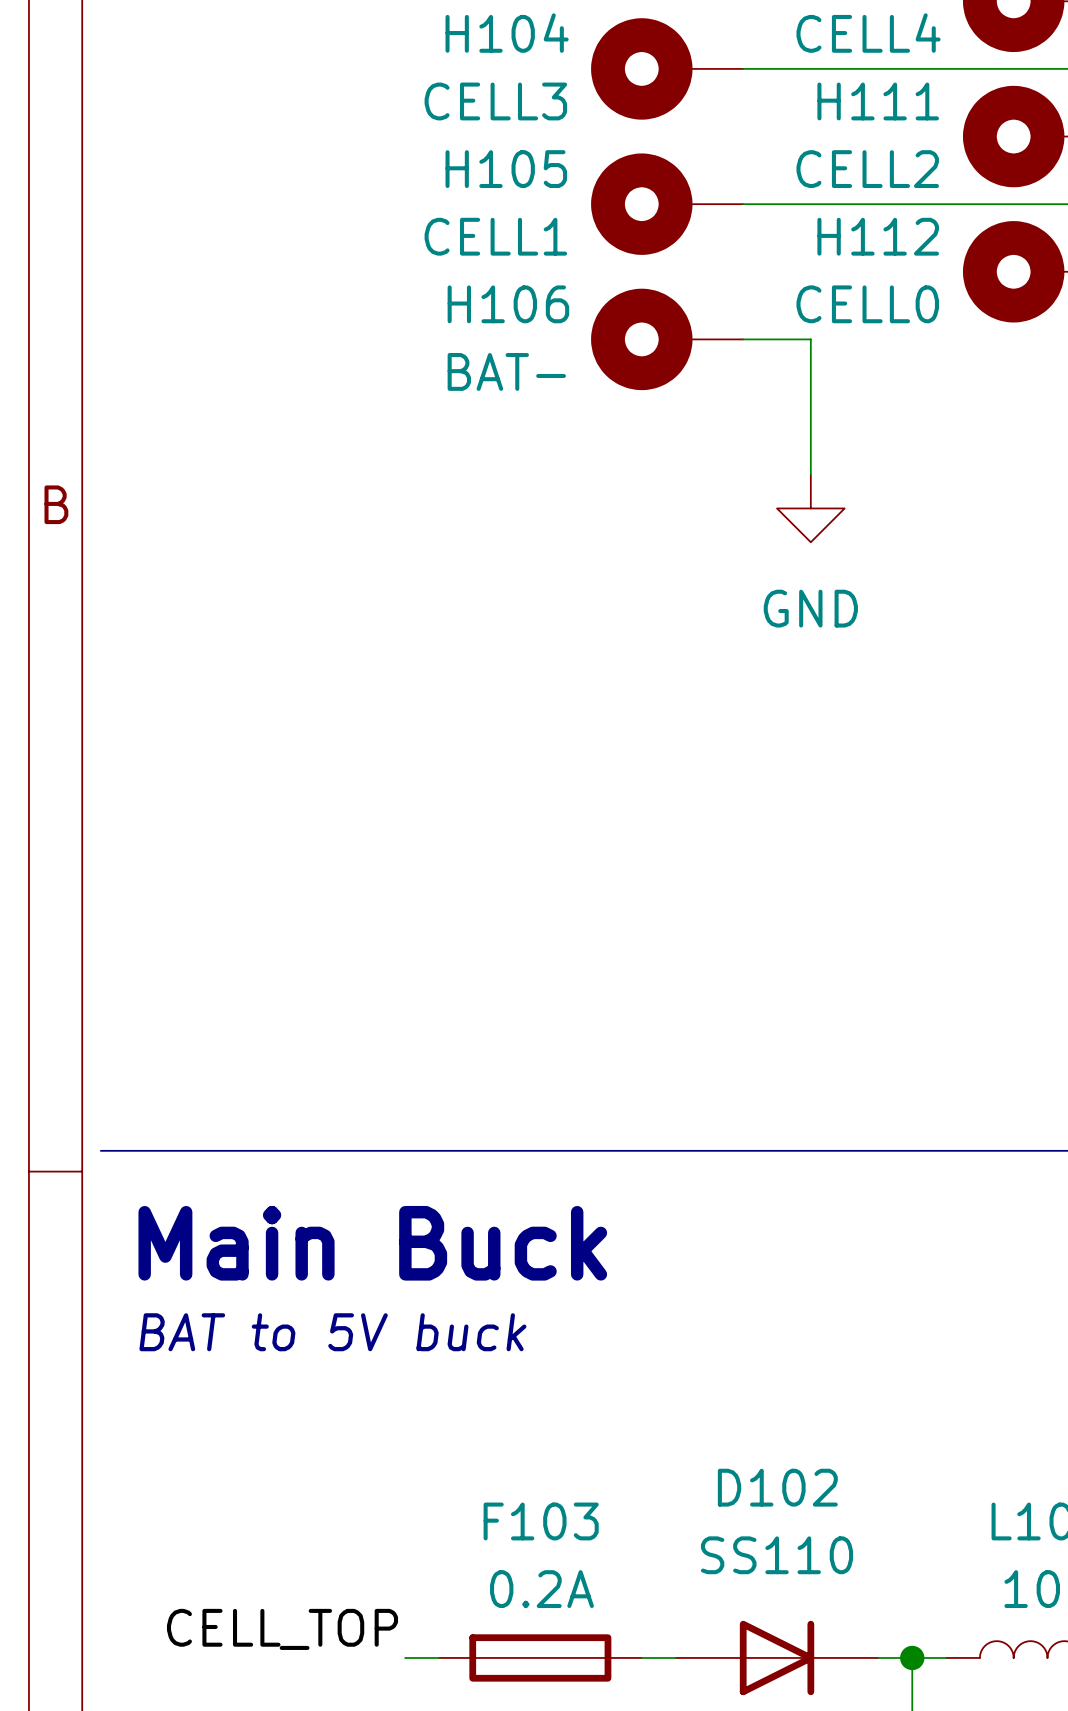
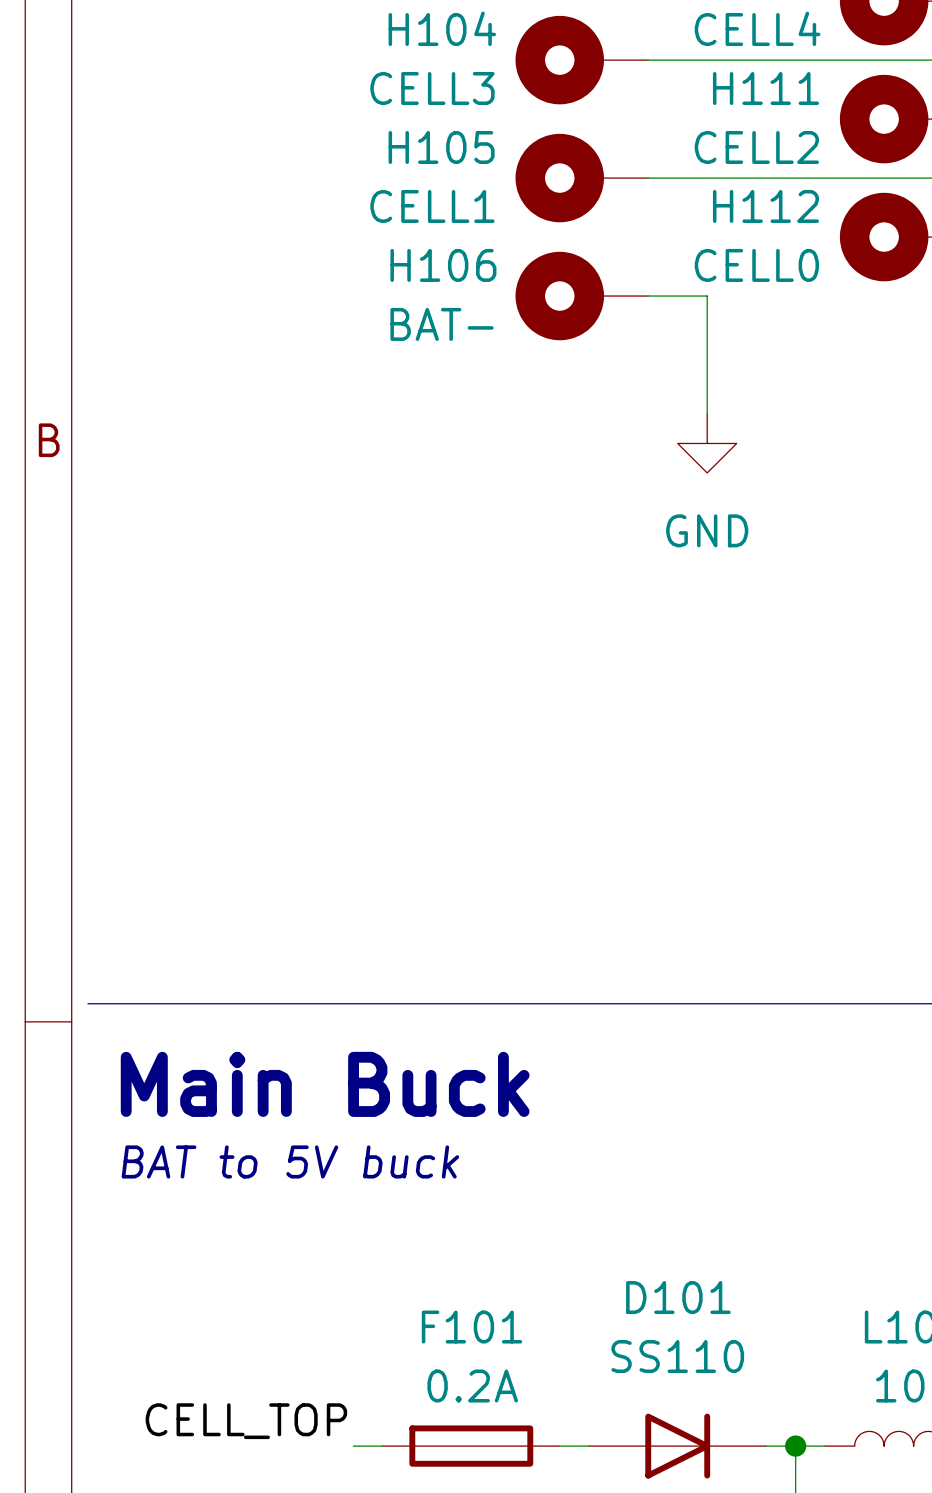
D102 name: D102 (777, 1487) -> D101 (678, 1297)
F103 name: F103 (541, 1521) -> F101 (472, 1327)

